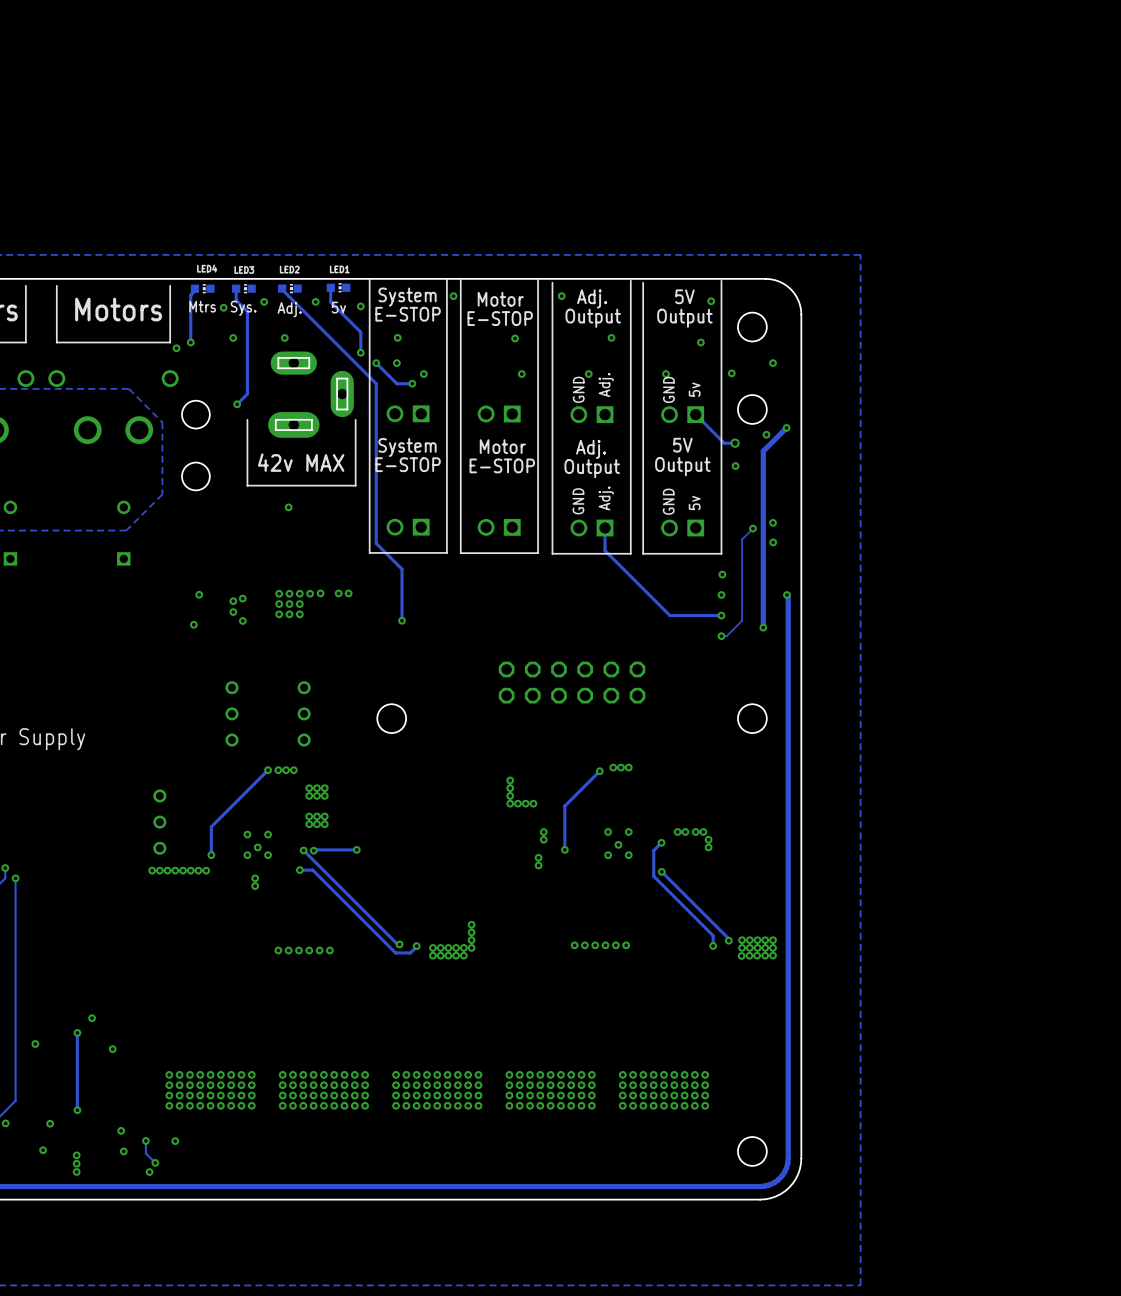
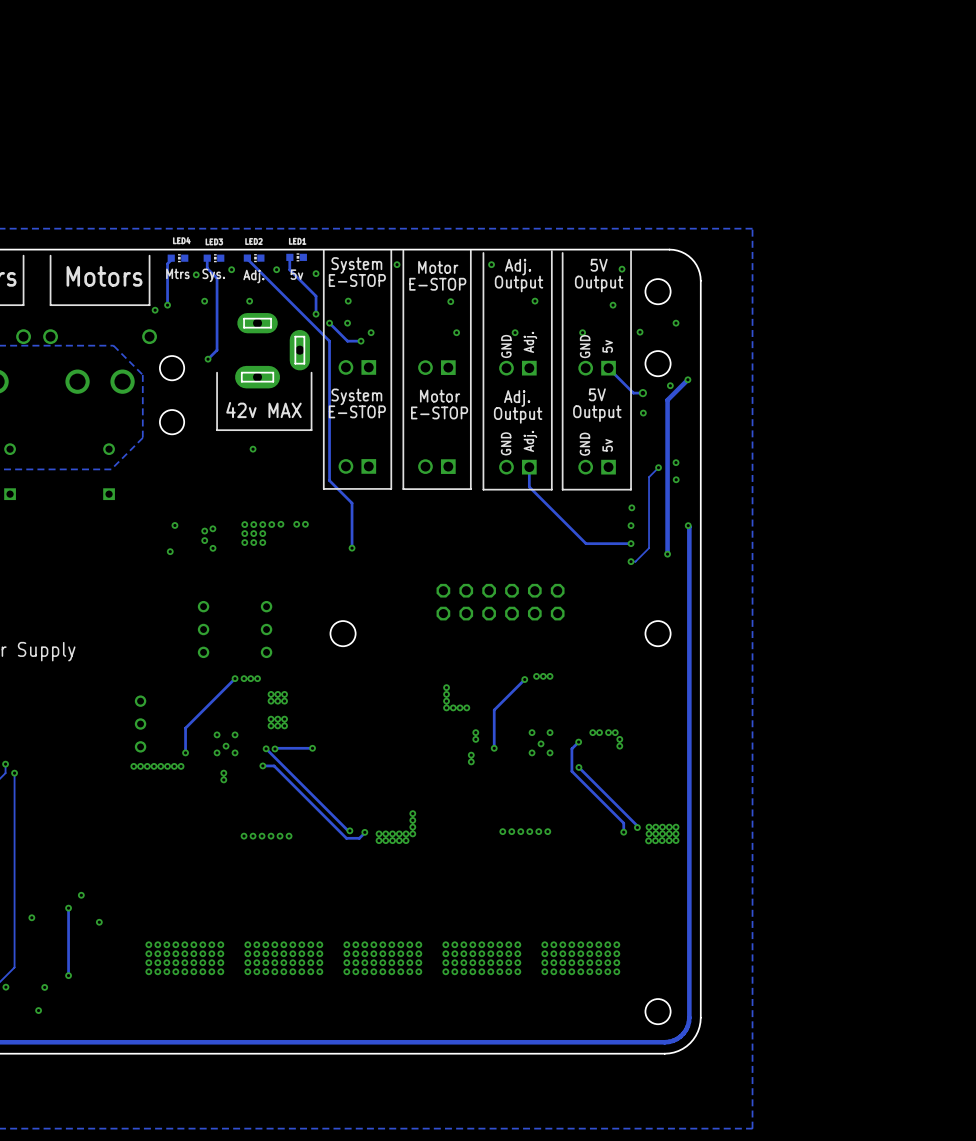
via: (121, 1130) -> none
track: (145, 1140) (145, 1153) (155, 1162) -> none
via: (145, 1140) -> none
via: (175, 1141) -> none
via: (123, 1151) -> none
via: (76, 1155) -> none
via: (155, 1162) -> none
via: (76, 1163) -> none
via: (76, 1171) -> none
via: (149, 1172) -> none

